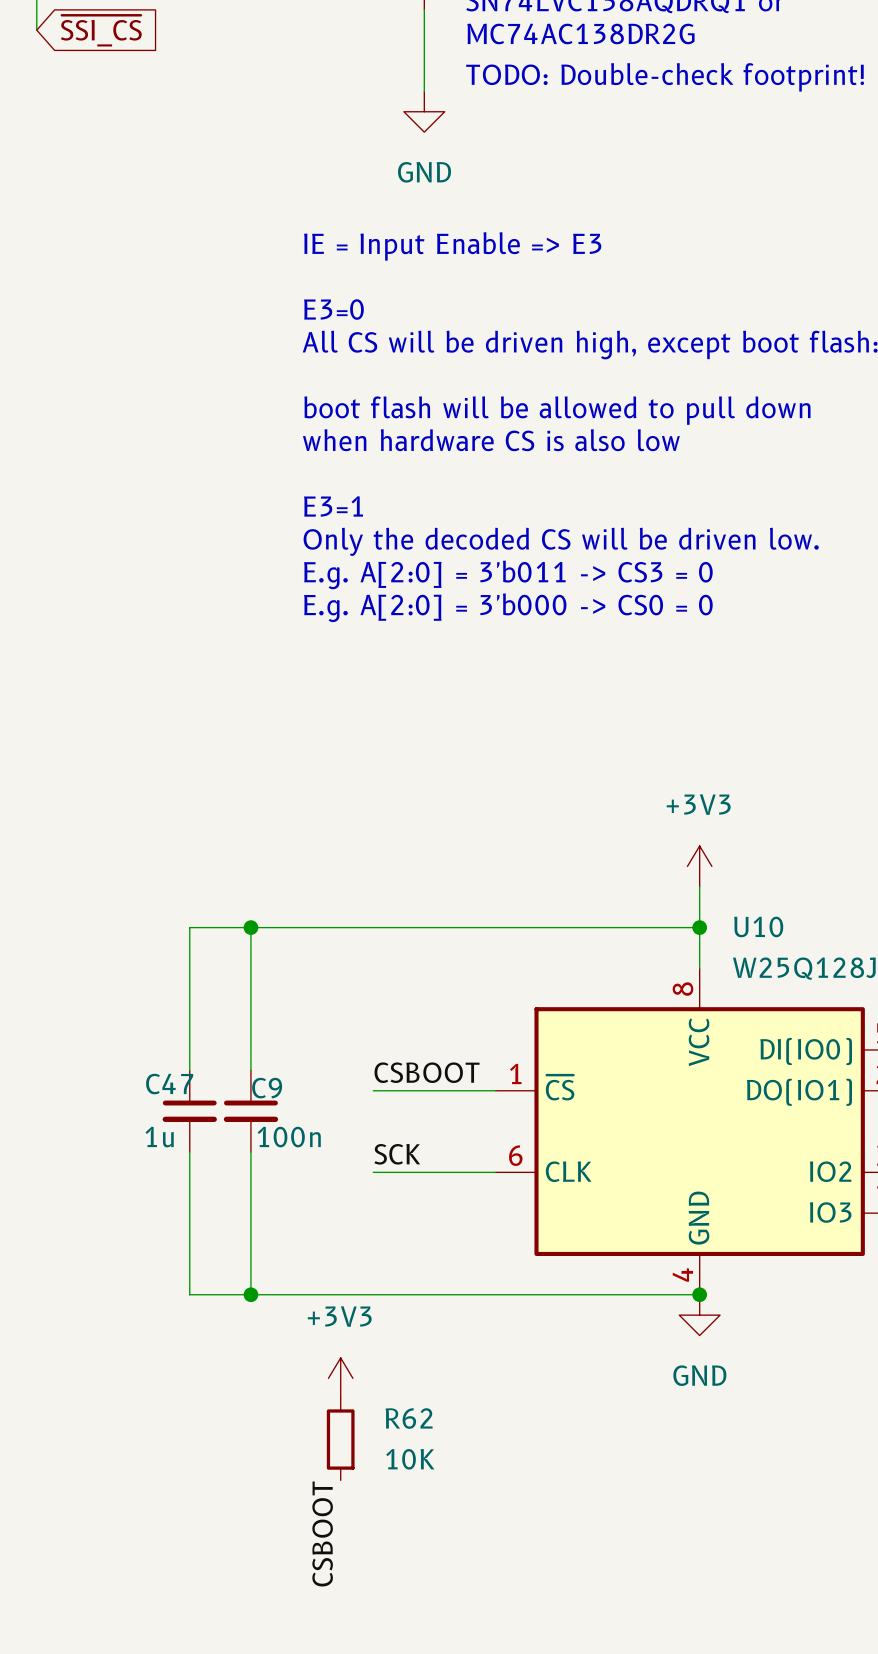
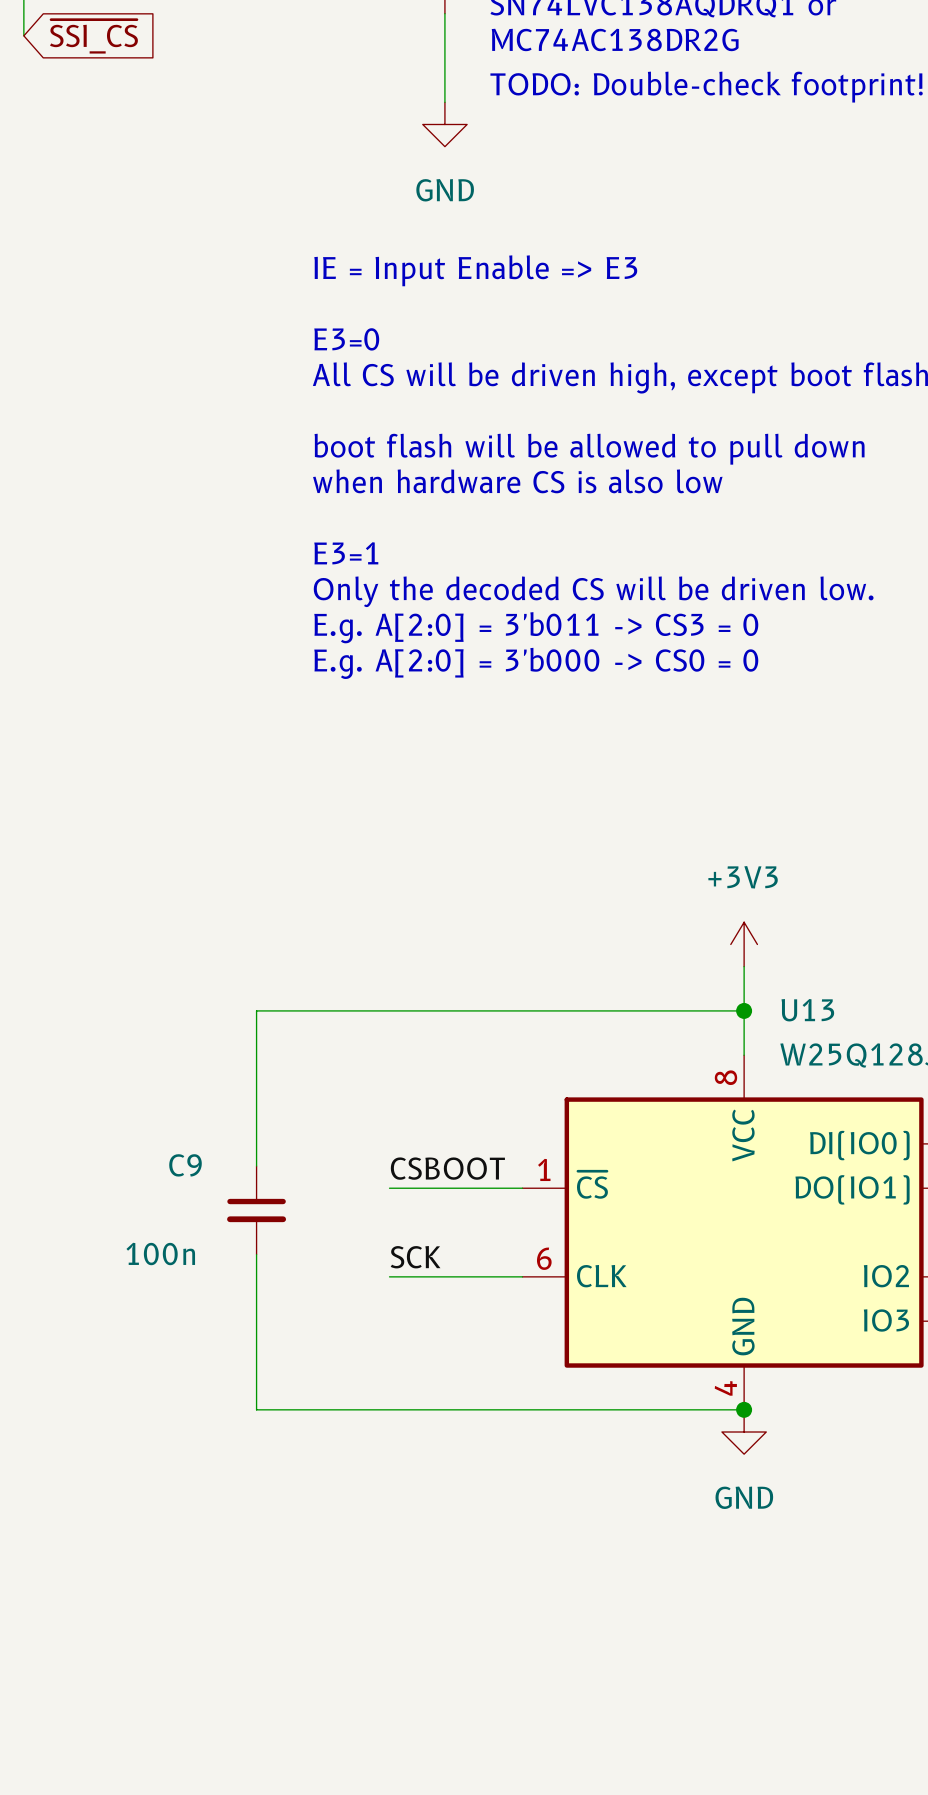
U10 name: U10 (758, 926) -> U13 (807, 1010)
wire: (250, 927) (189, 927) (189, 1070) -> none
junction: (250, 927) -> none
C9 name position: C9 (267, 1088) -> C9 (185, 1165)
C47: 1u (189, 1111) -> none
C9 value position: 100n (289, 1137) -> 100n (160, 1254)
wire: (189, 1151) (189, 1294) (250, 1294) -> none
junction: (250, 1294) -> none
power symbol: +3V3 (340, 1378) -> none
R62: 10K (340, 1439) -> none
label: CSBOOT (322, 1533) -> none

